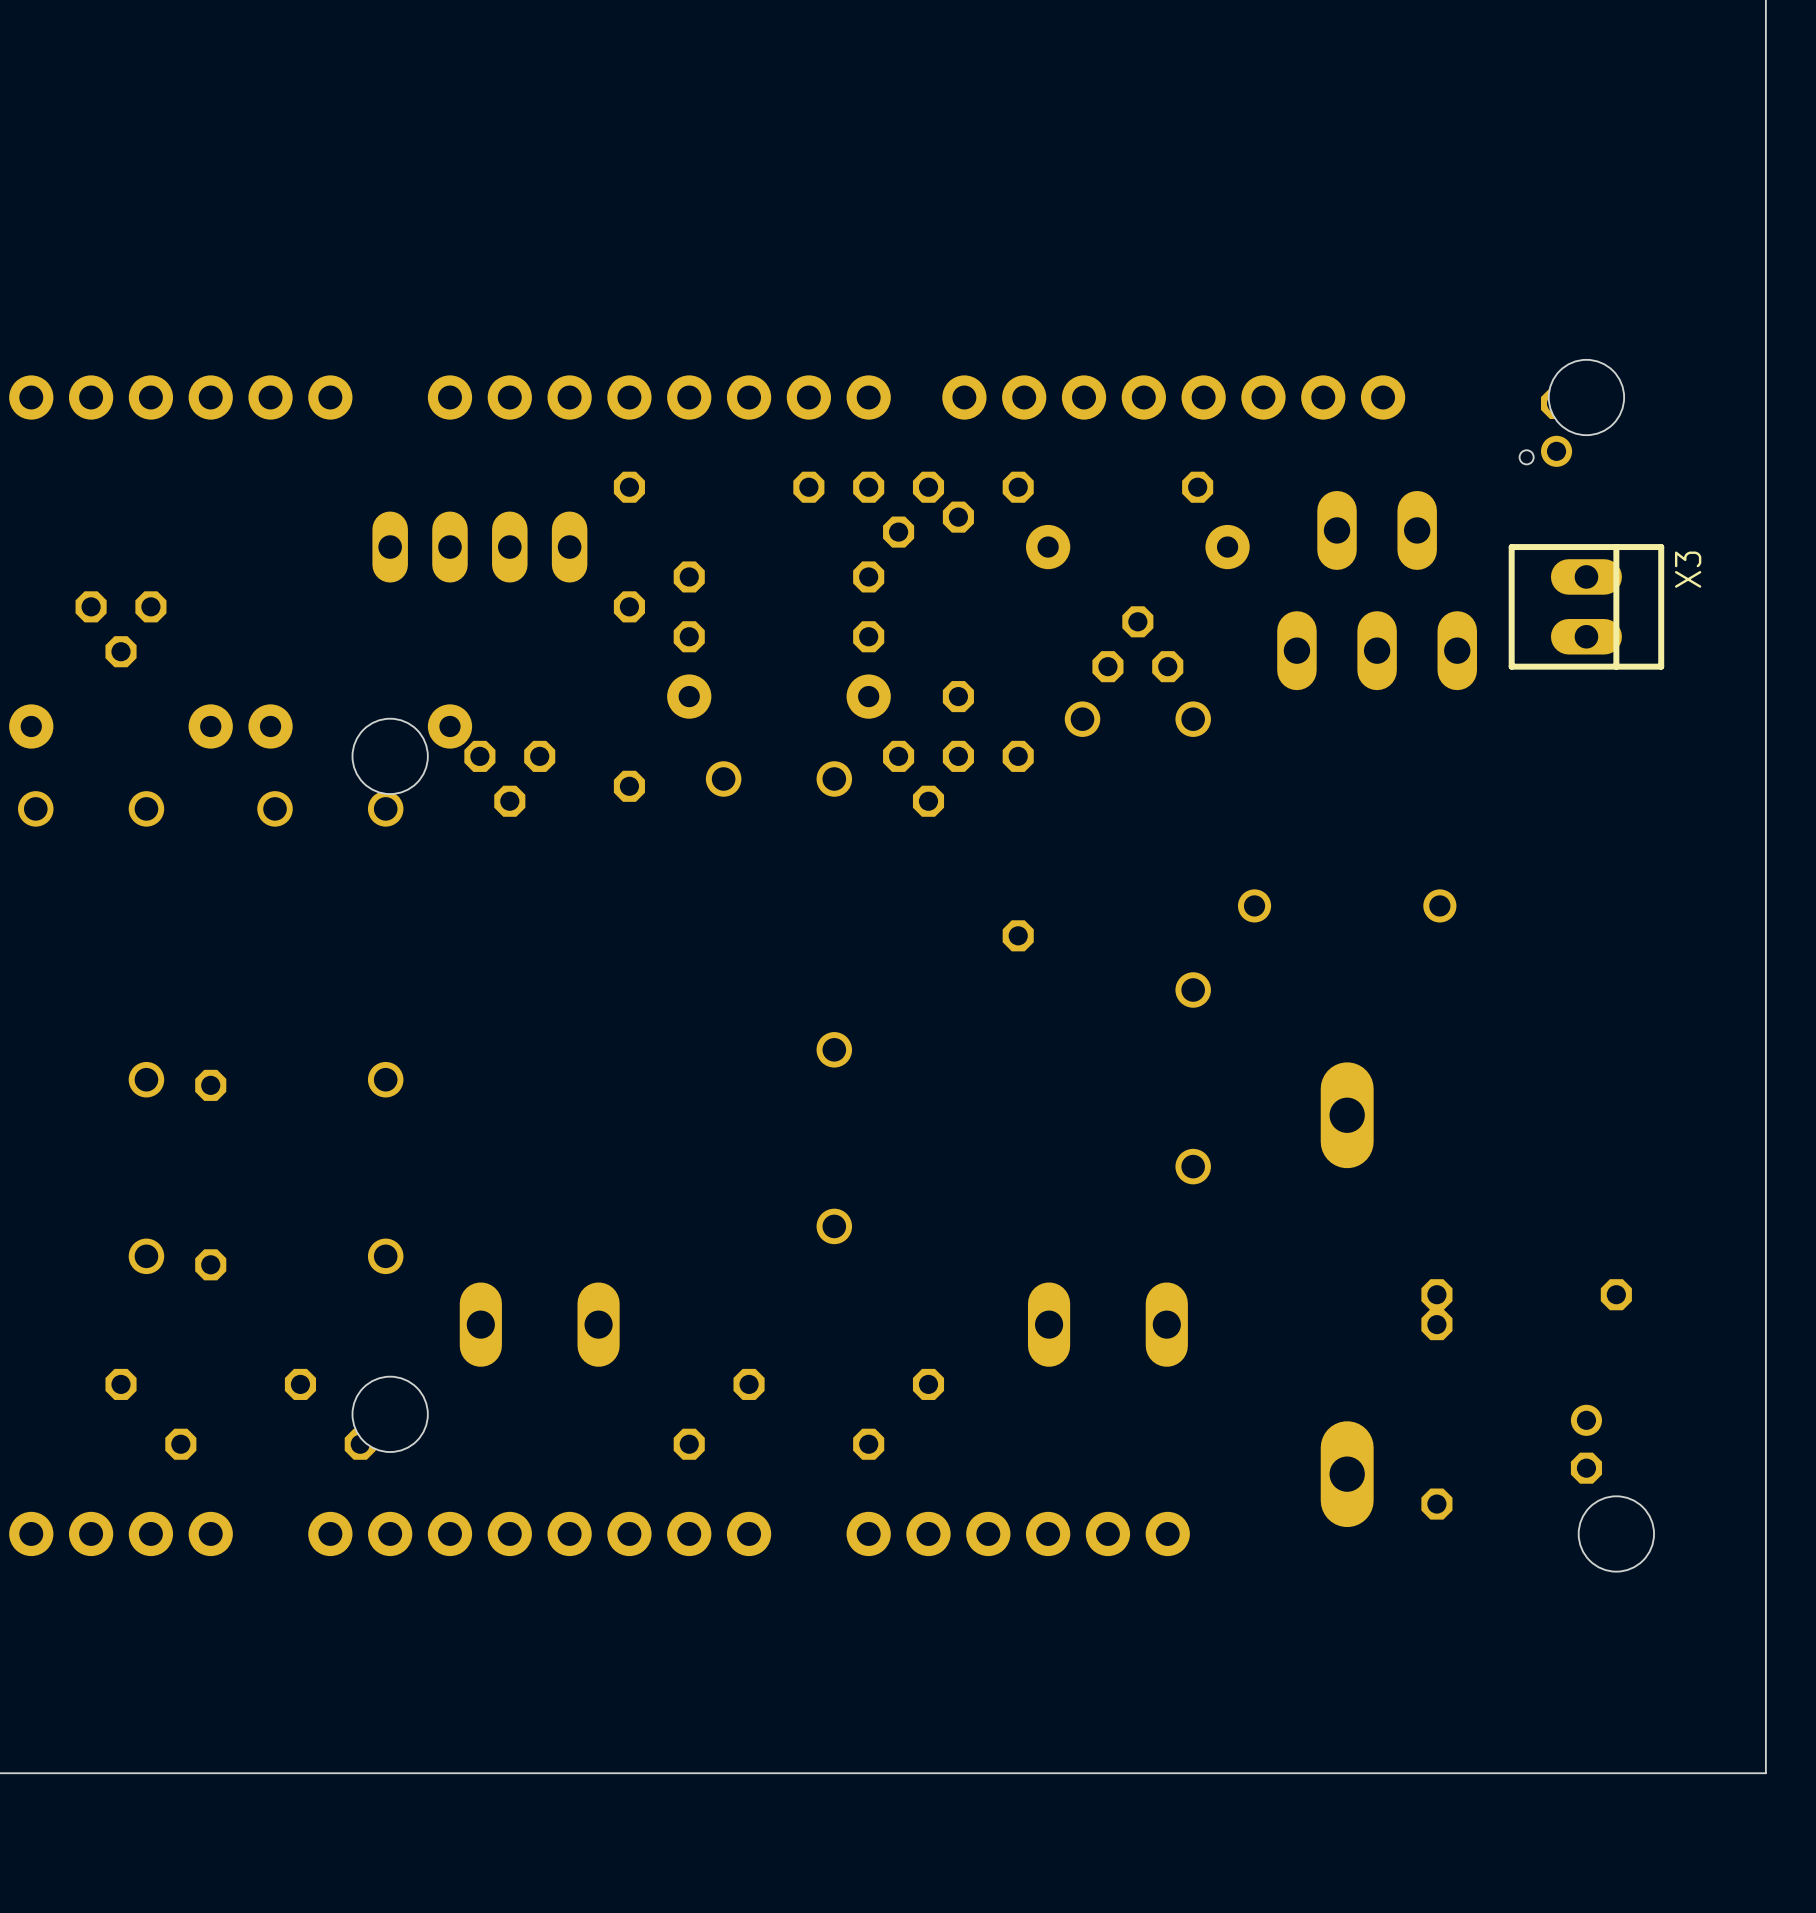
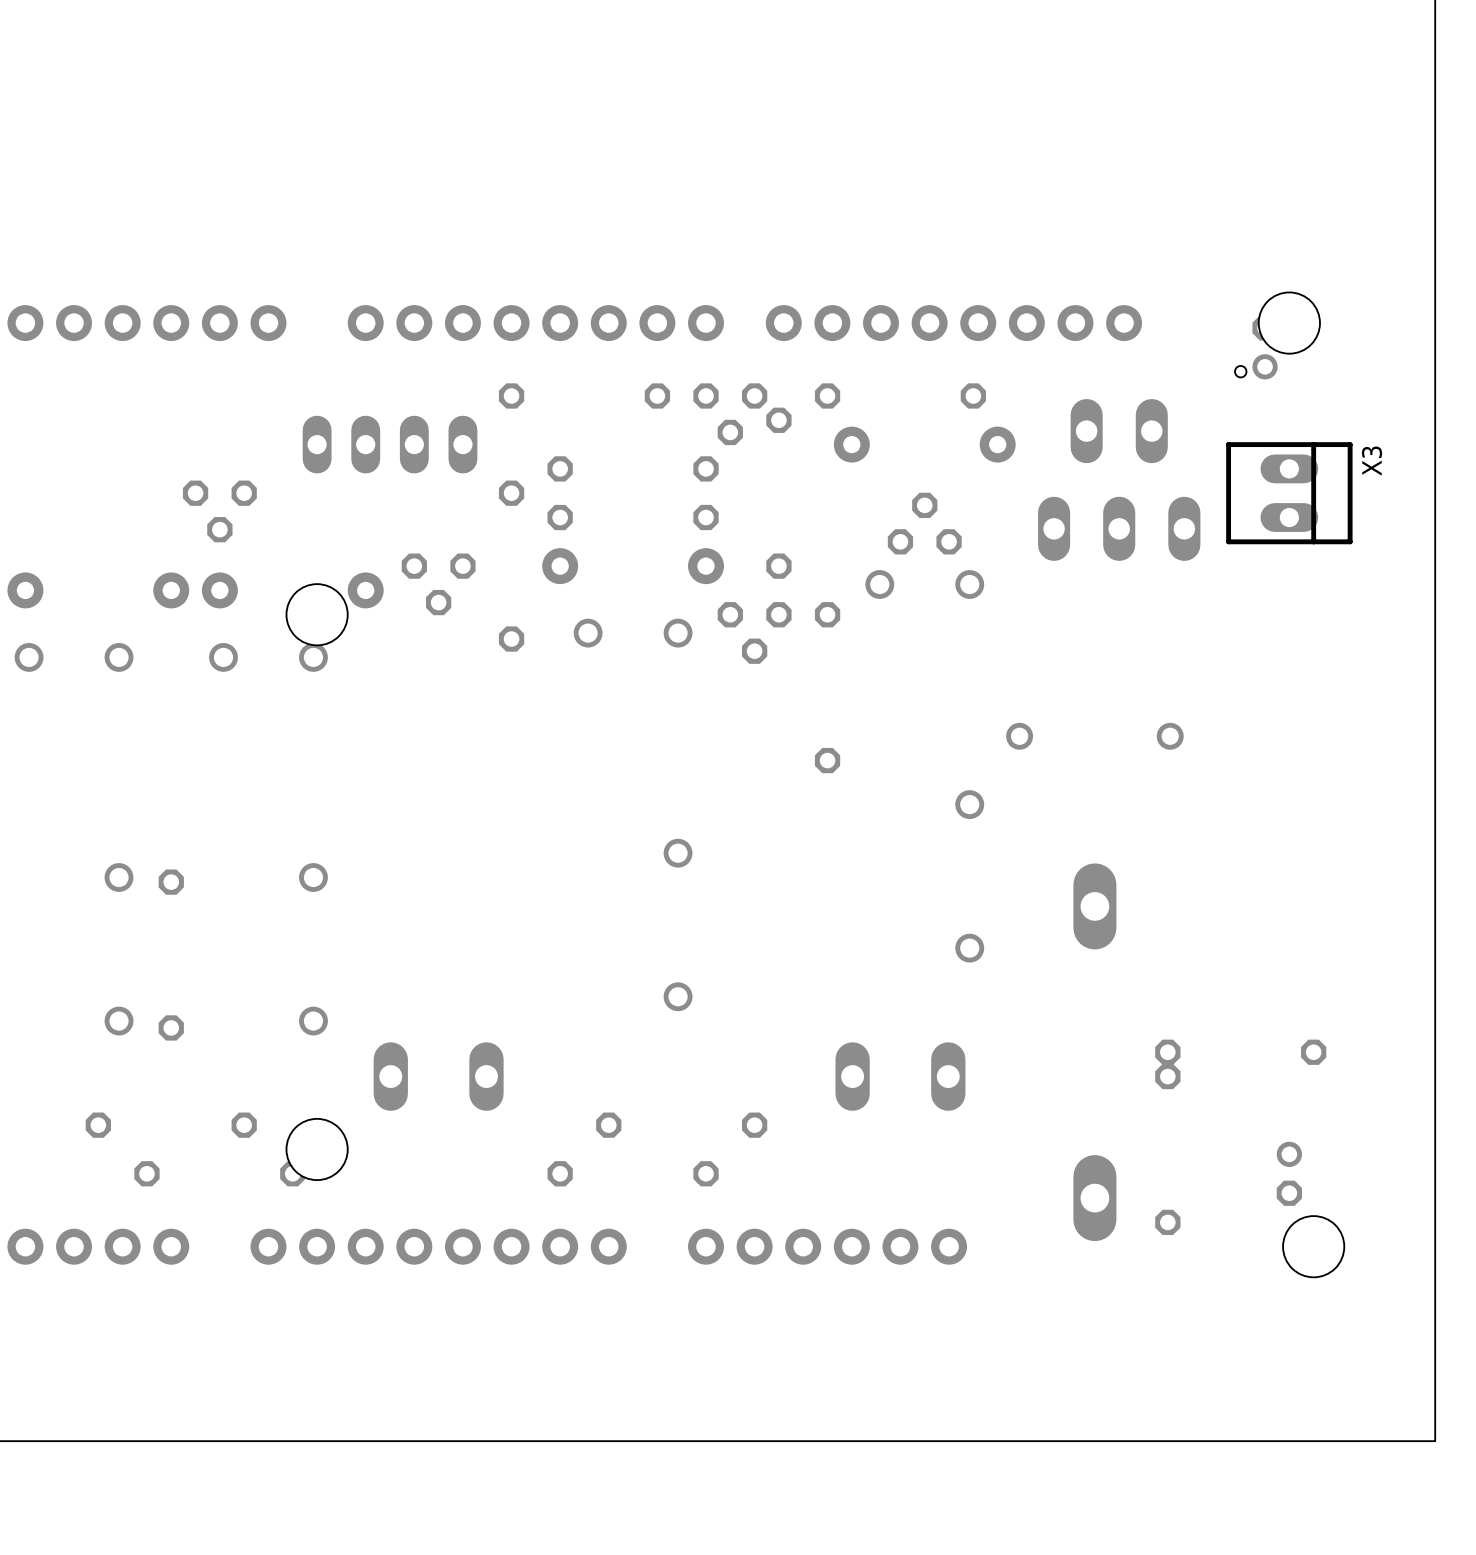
part: (121, 629) -> none
part: none -> (219, 511)
part position: (509, 778) -> (438, 584)

